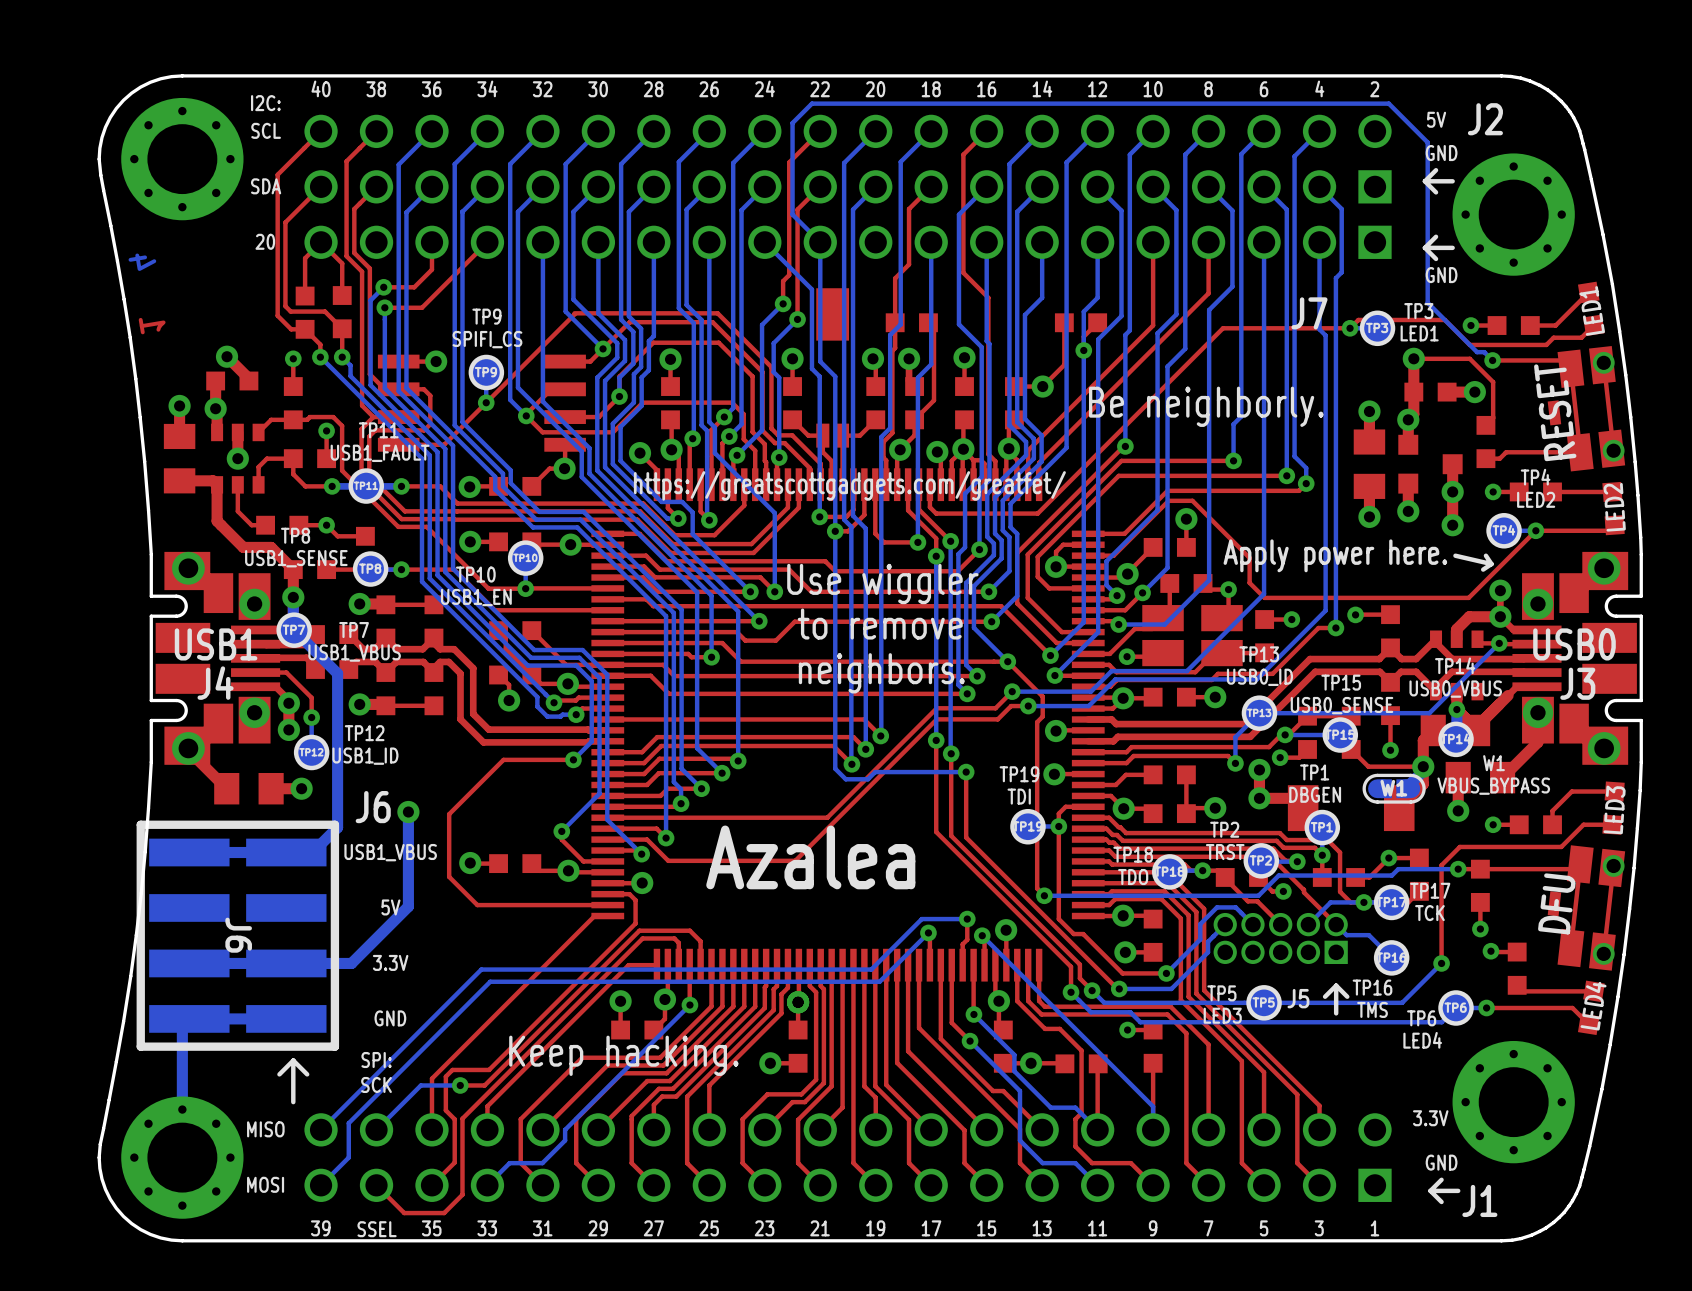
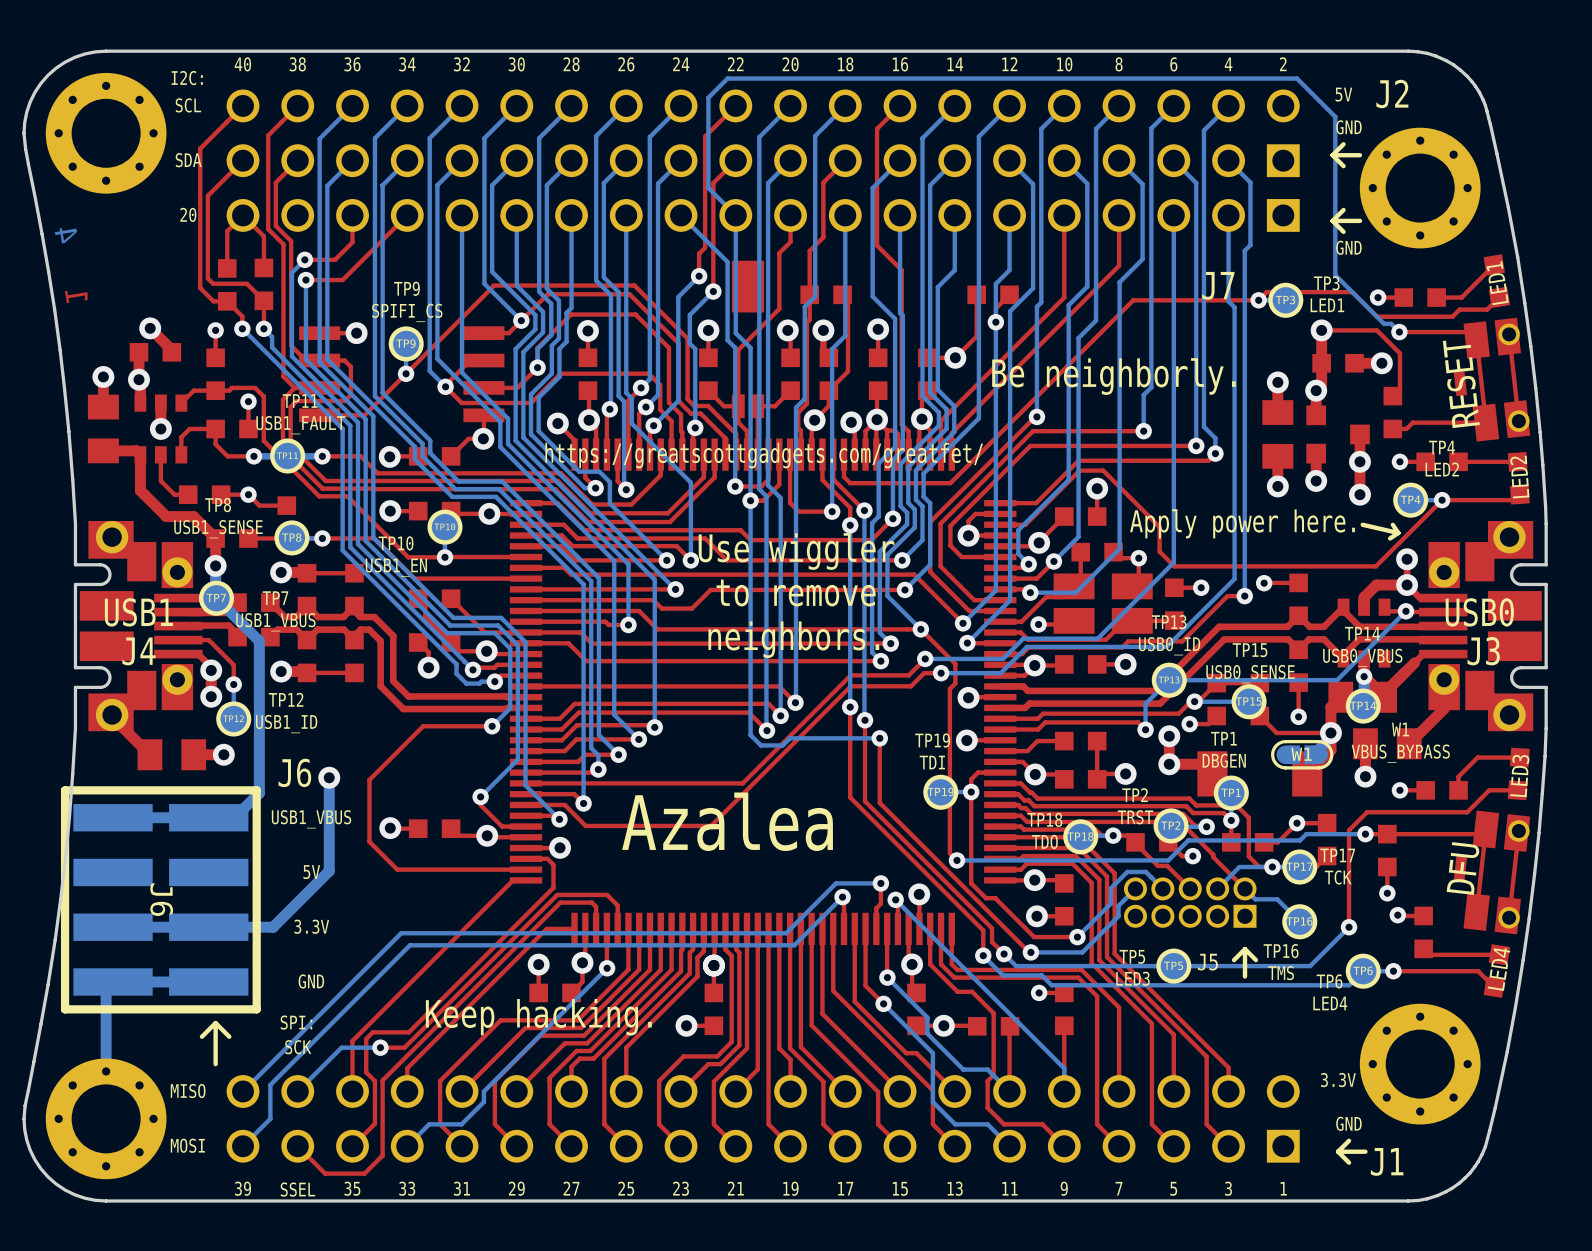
top track: none -> (790, 215) (790, 241) (779, 253) (779, 308) (738, 350) (738, 406)

